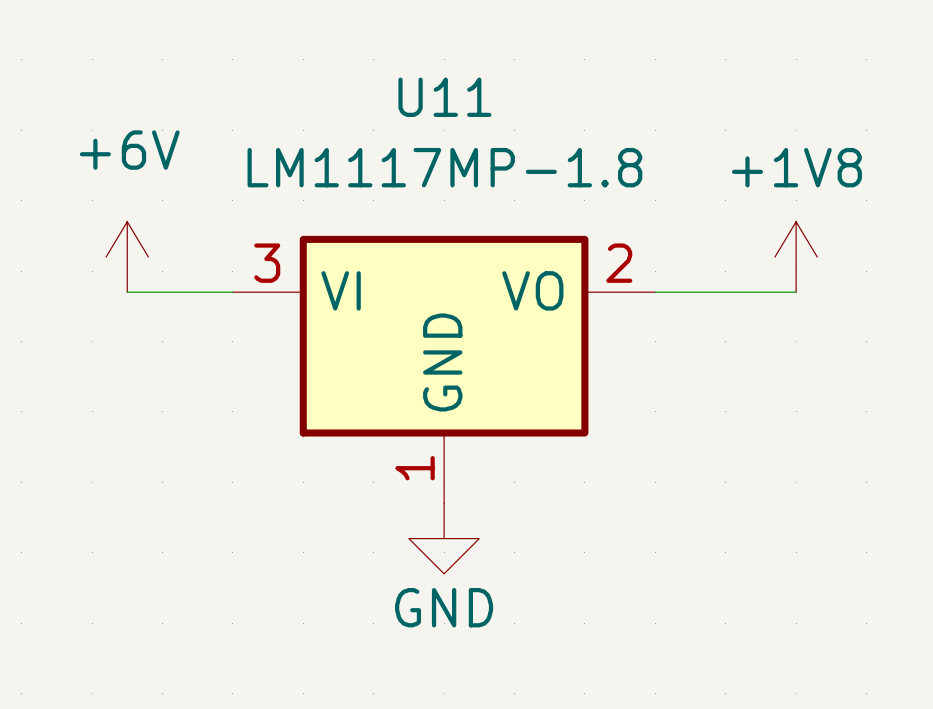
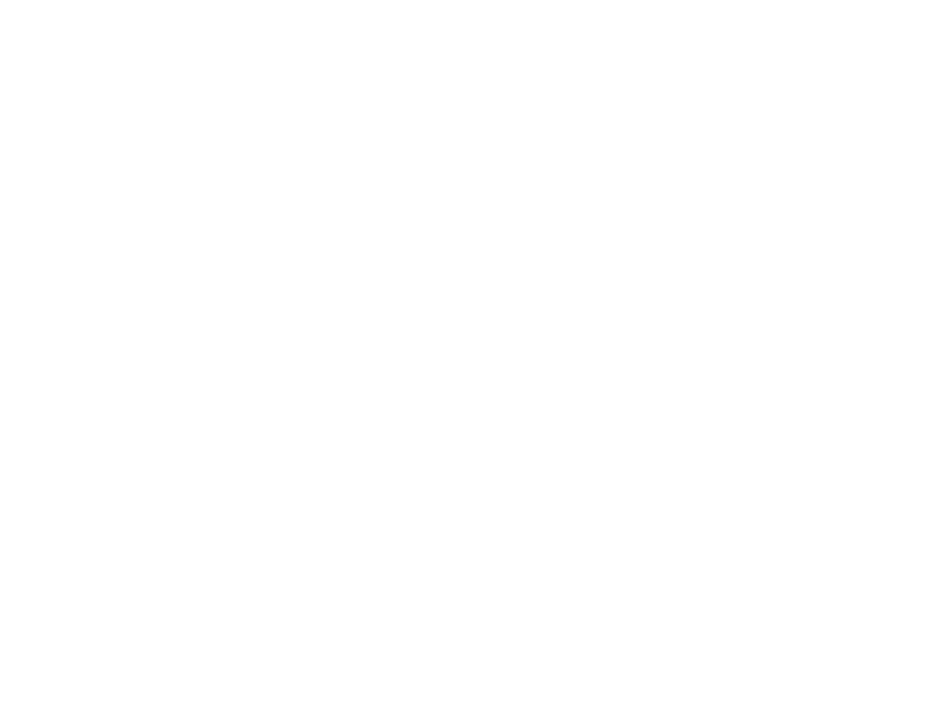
power symbol: +6V (127, 256) -> none
power symbol: +1V8 (796, 256) -> none
wire: (127, 292) (232, 292) -> none
wire: (655, 292) (796, 292) -> none
U11: LM1117MP-1.8 (444, 369) -> none
power symbol: GND (444, 538) -> none

